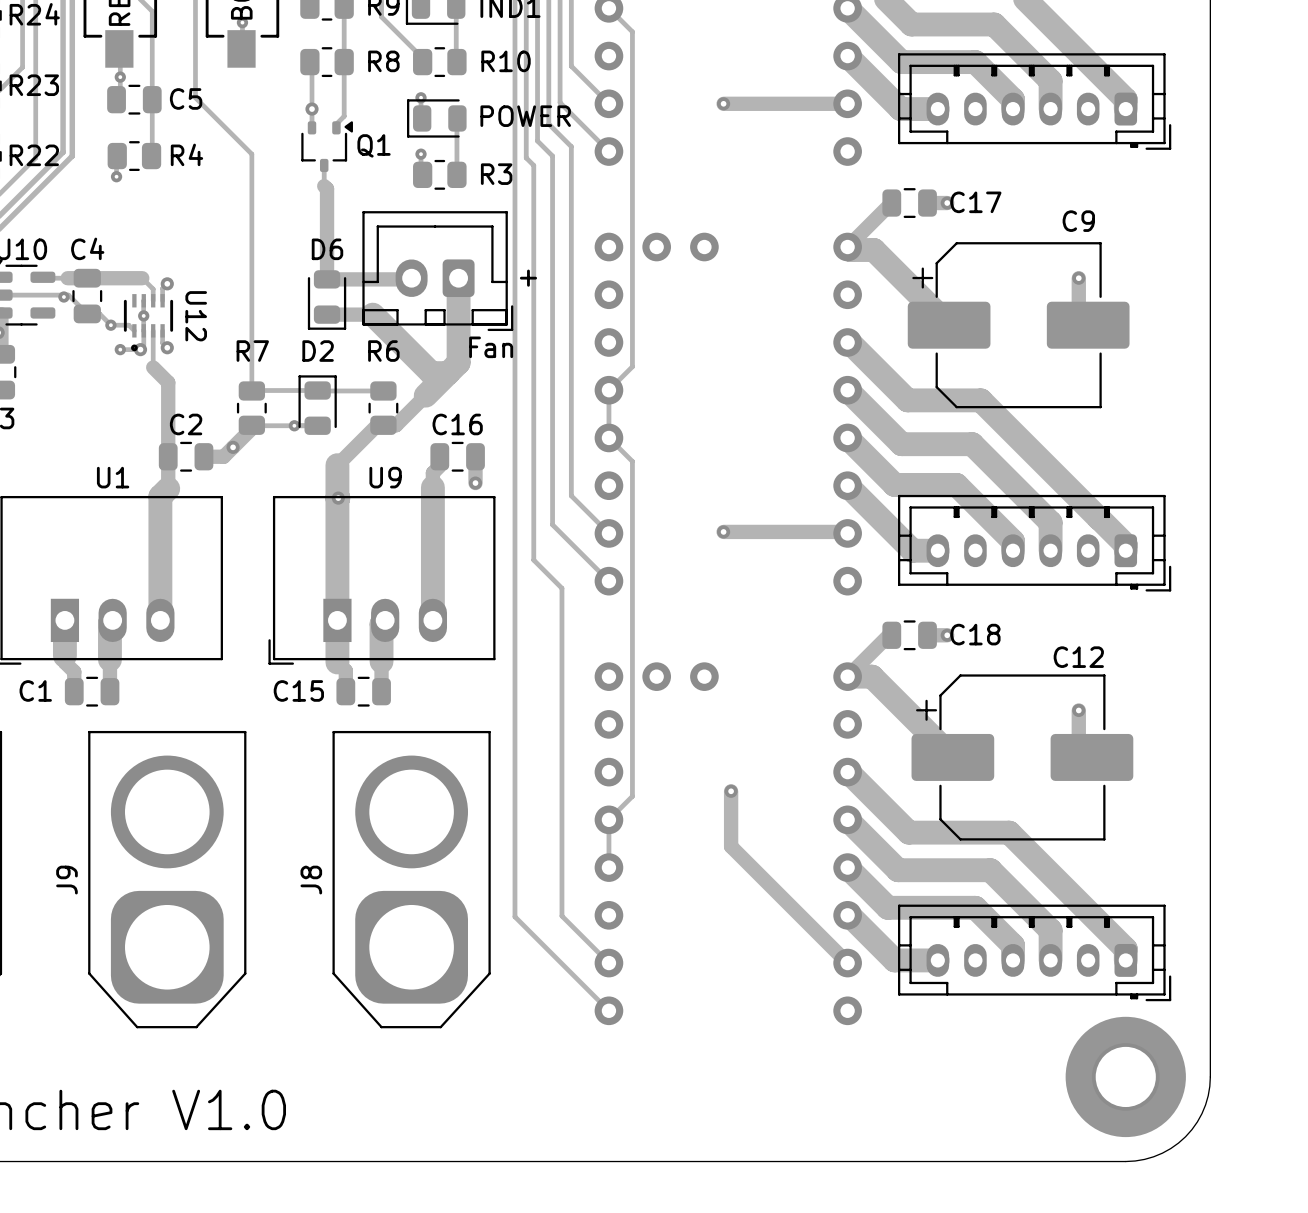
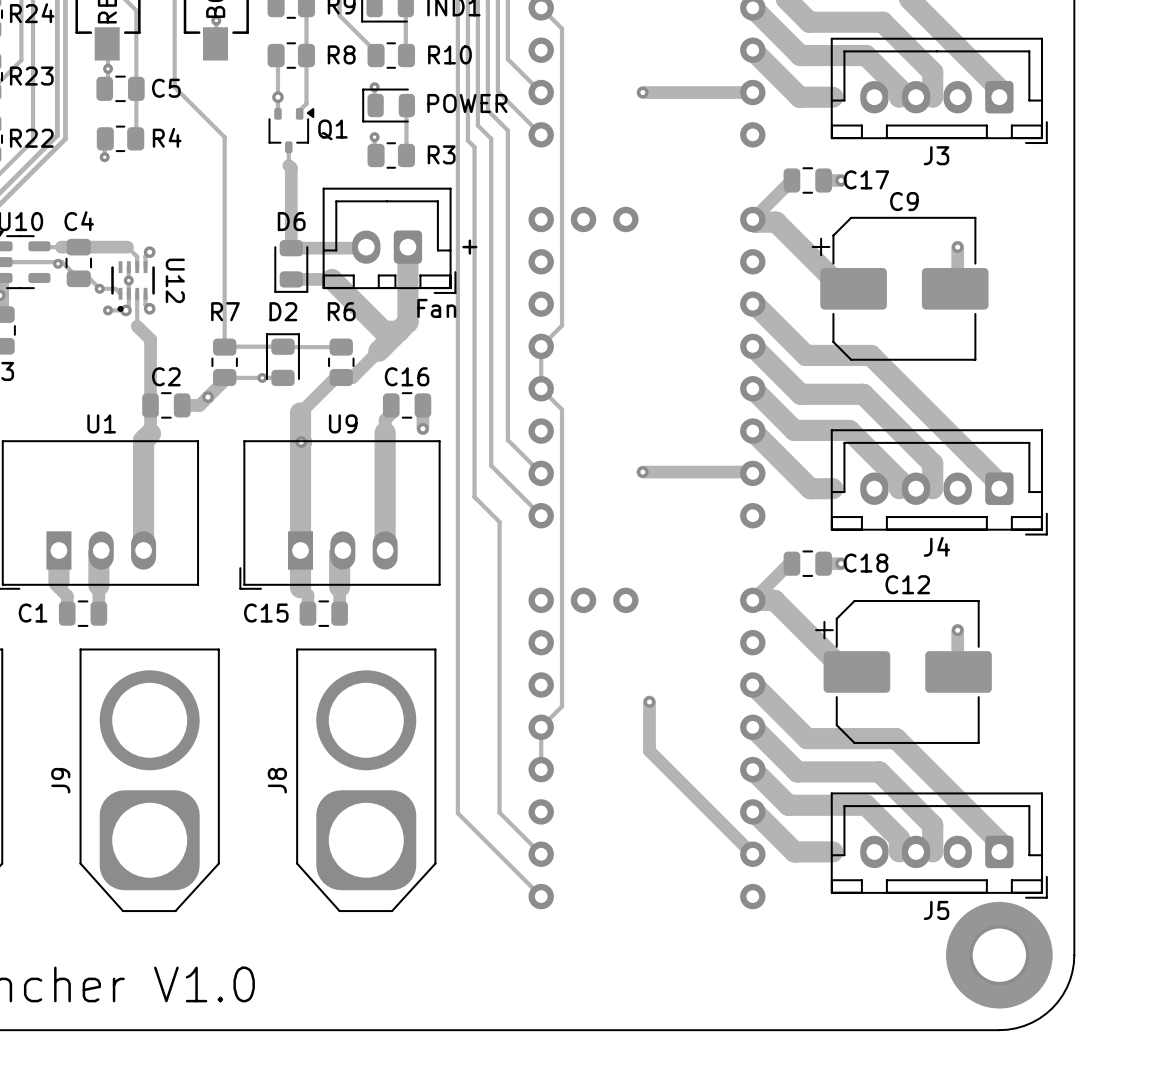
part: (1034, 101) -> none
J3: none -> (939, 90)
C9 name position: C9 (1078, 221) -> C9 (904, 201)
C9 footprint: [907, 242, 1130, 409] -> [811, 216, 989, 361]
part: (1034, 543) -> none
J4: none -> (939, 482)
C12 name position: C12 (1078, 657) -> C12 (907, 584)
C12 footprint: [911, 674, 1134, 841] -> [815, 600, 992, 744]
part: (1034, 952) -> none
J5: none -> (939, 845)

